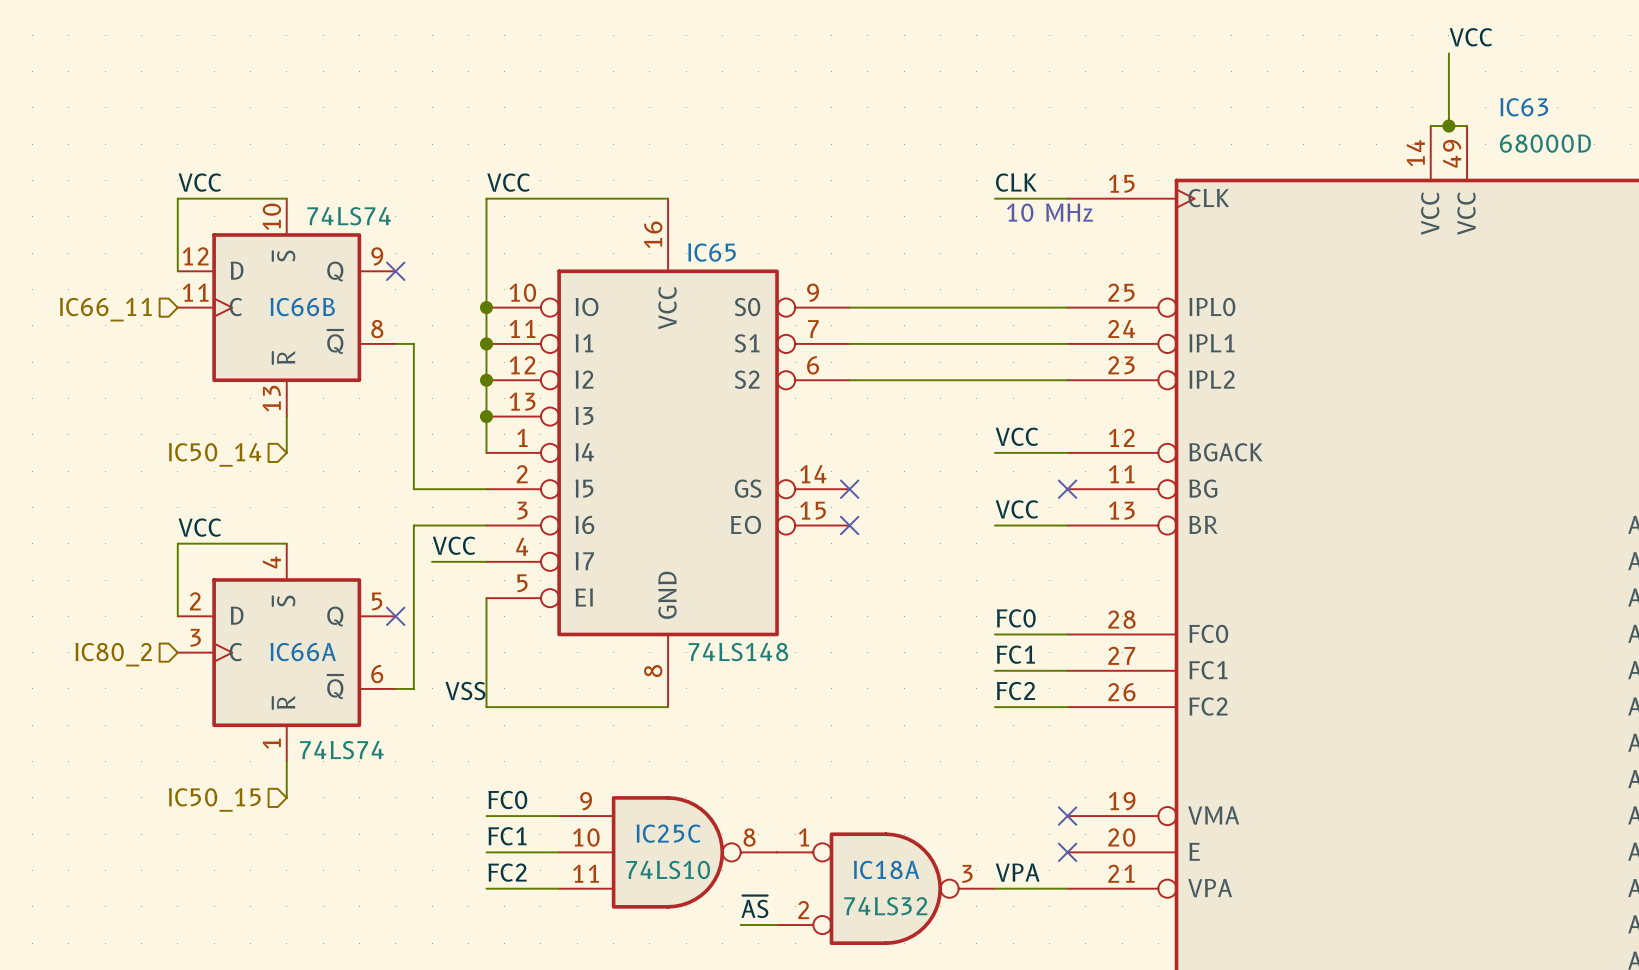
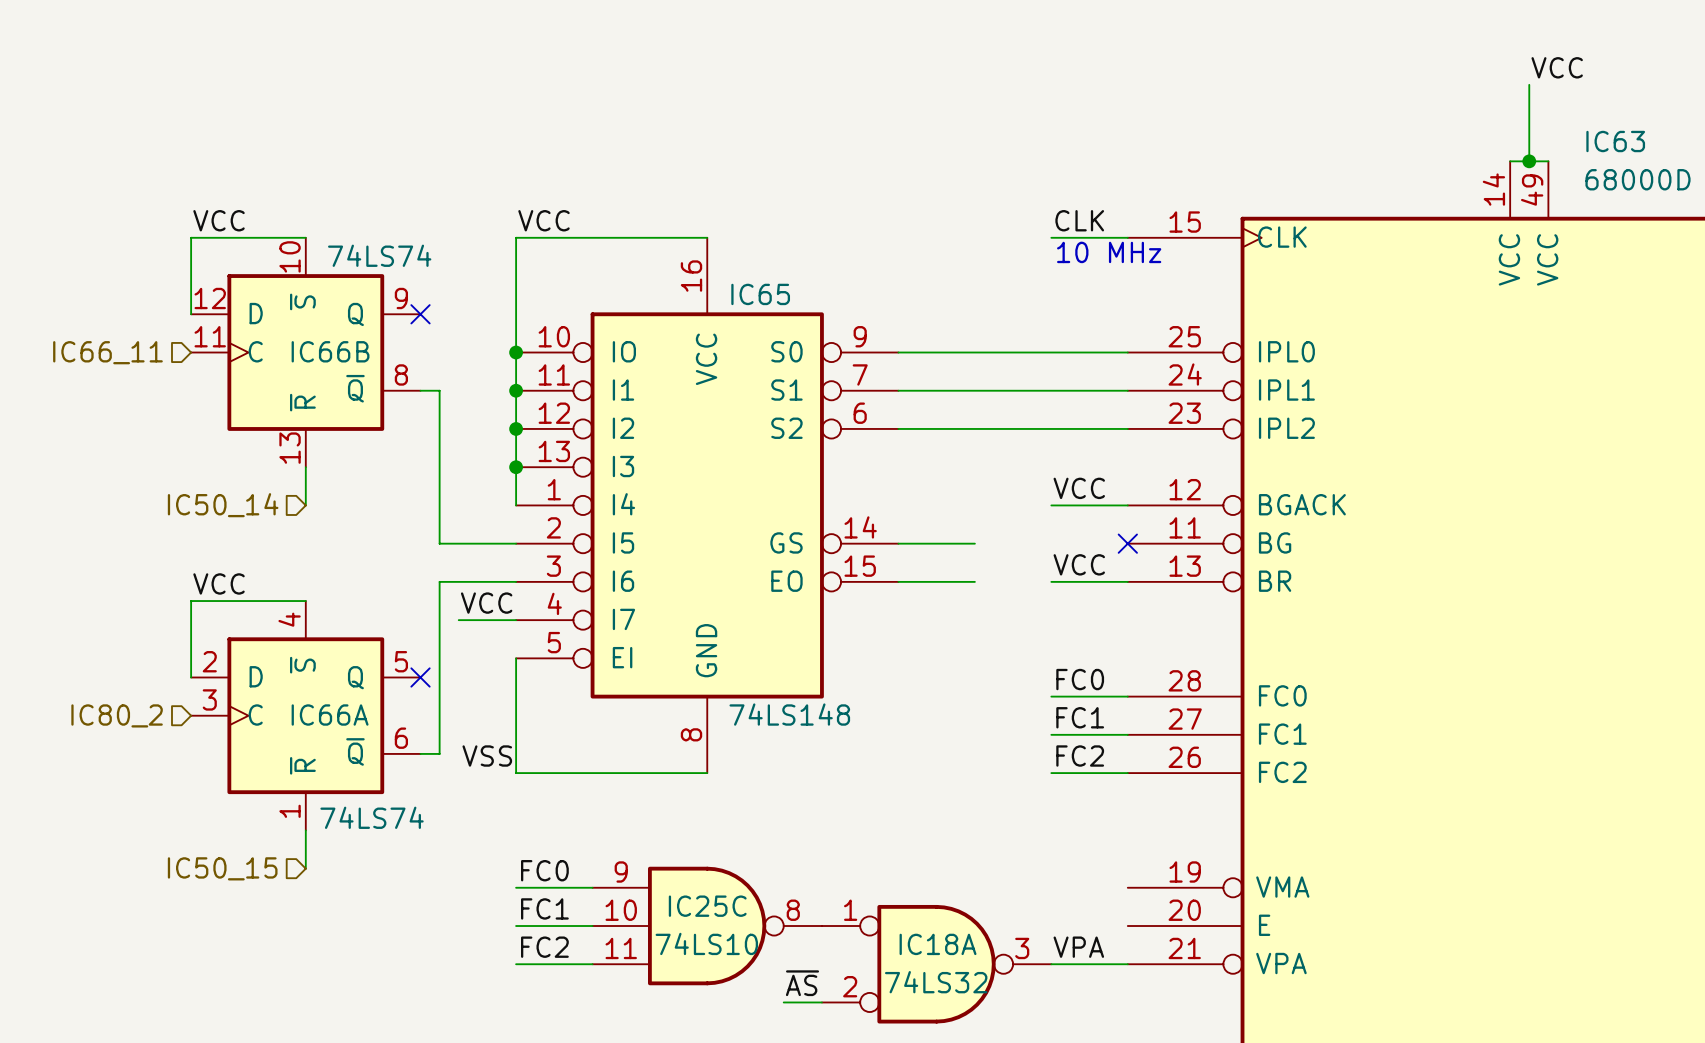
wire: none -> (898, 543) (974, 543)
no-connect mark: (849, 489) -> none
wire: none -> (898, 581) (974, 581)
no-connect mark: (849, 525) -> none
no-connect mark: (1067, 816) -> none
no-connect mark: (1067, 852) -> none

